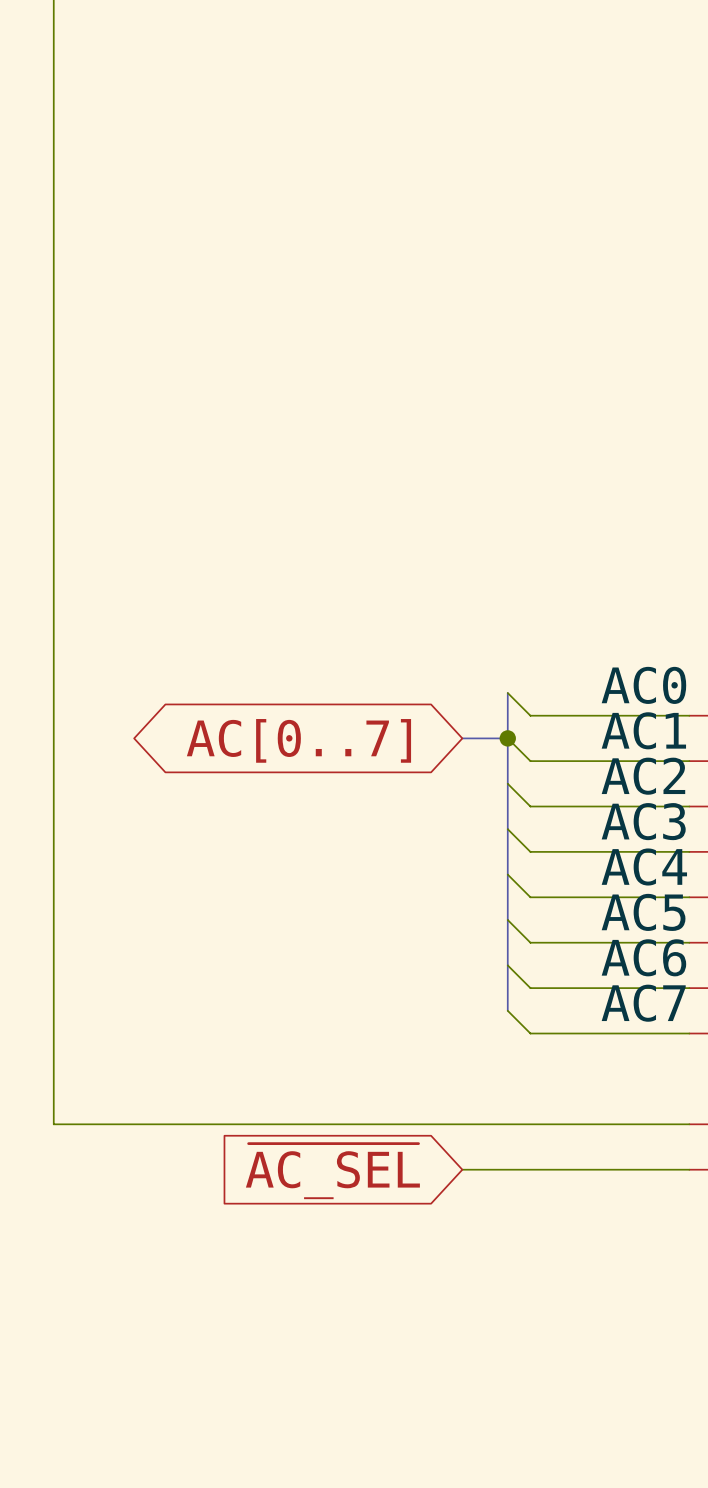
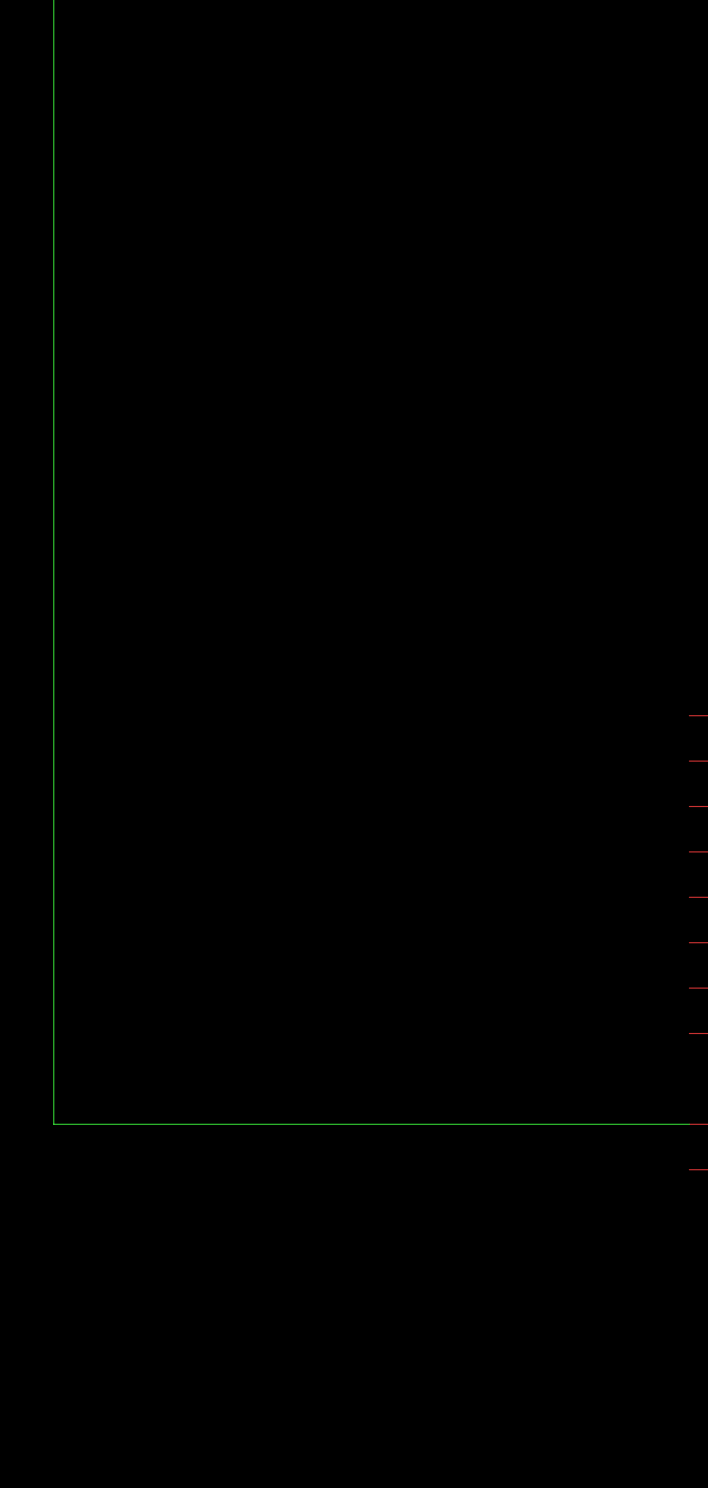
label: AC0 (643, 685) -> none
wire: (507, 693) (530, 715) (689, 715) -> none
bus: (507, 693) (507, 1010) -> none
label: AC1 (643, 730) -> none
bus: (462, 738) (507, 738) -> none
wire: (507, 738) (530, 761) (689, 761) -> none
junction: (507, 738) -> none
global label: AC[0..7] (298, 740) -> none
label: AC2 (643, 776) -> none
wire: (507, 783) (530, 806) (689, 806) -> none
label: AC3 (643, 821) -> none
wire: (507, 829) (530, 851) (689, 851) -> none
label: AC4 (644, 867) -> none
wire: (507, 874) (530, 897) (689, 897) -> none
label: AC5 (643, 912) -> none
wire: (507, 920) (530, 942) (689, 942) -> none
label: AC6 (643, 957) -> none
wire: (507, 965) (530, 988) (689, 988) -> none
label: AC7 (643, 1003) -> none
wire: (507, 1010) (530, 1033) (689, 1033) -> none
wire: (462, 1169) (689, 1169) -> none
global label: ~{AC_SEL} (332, 1171) -> none

